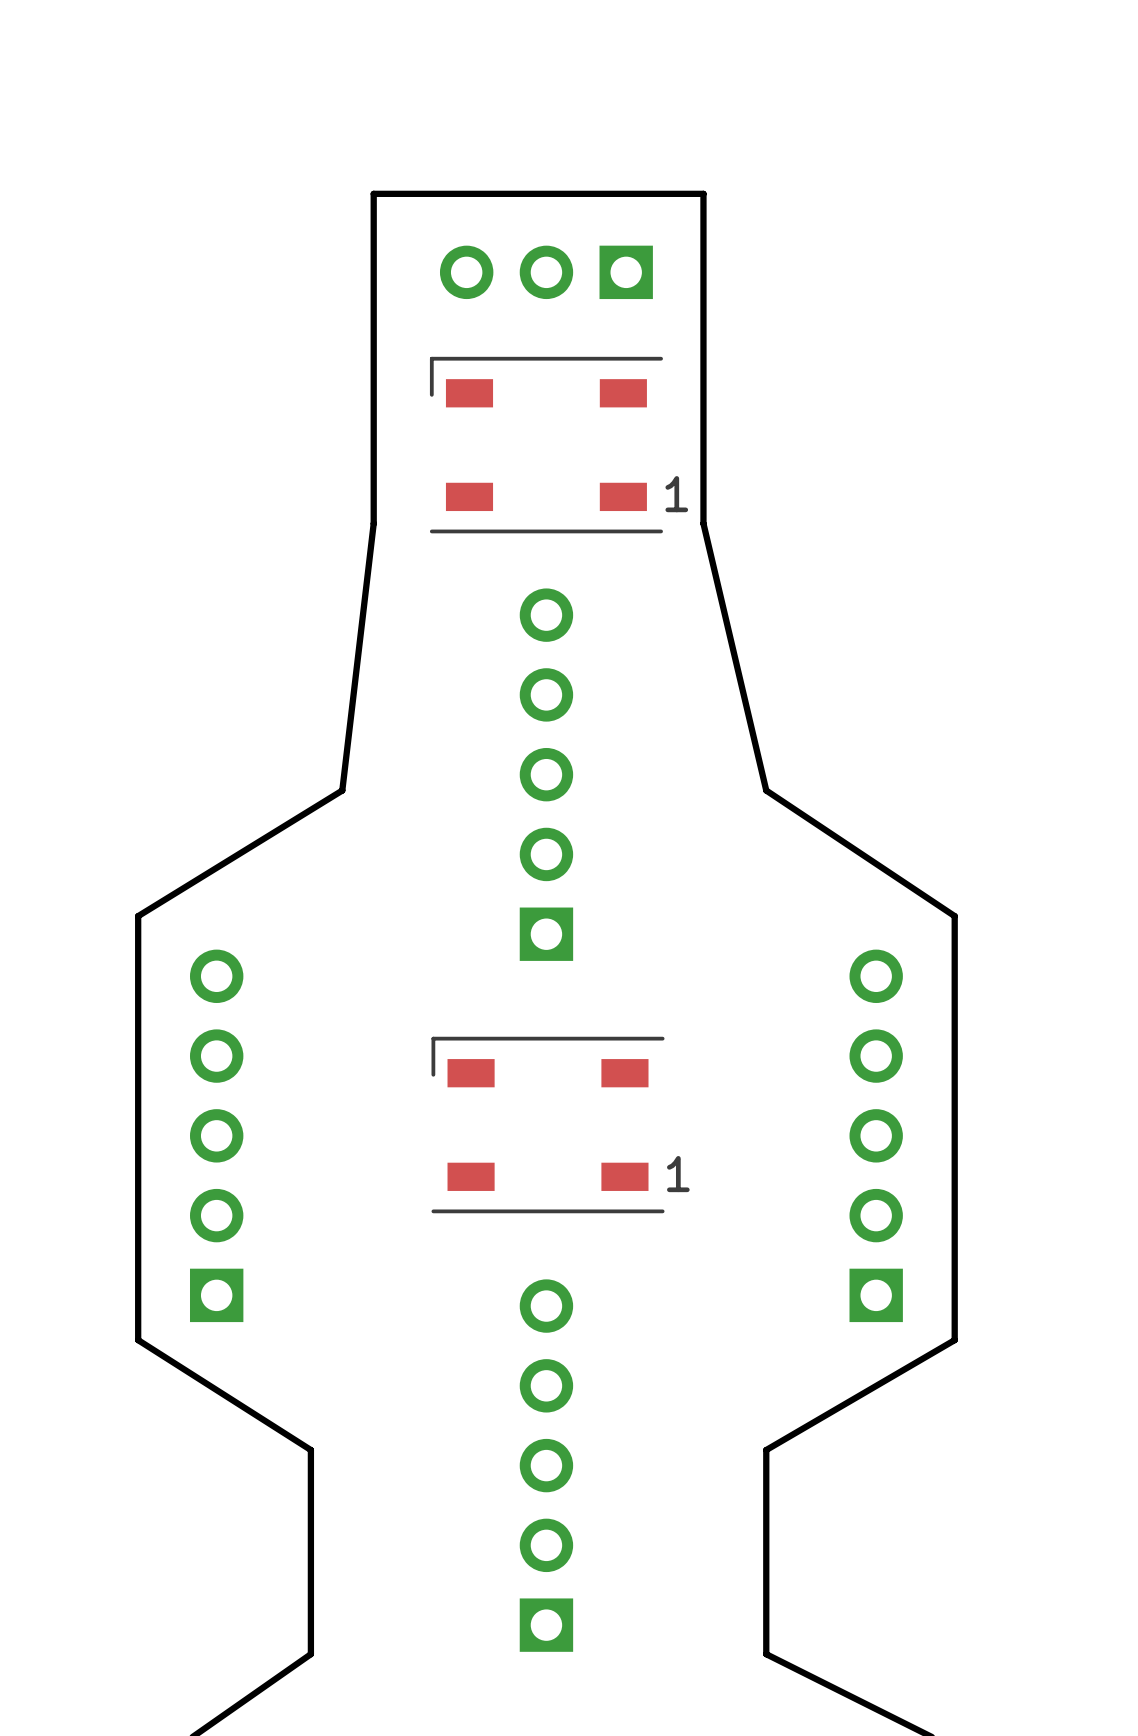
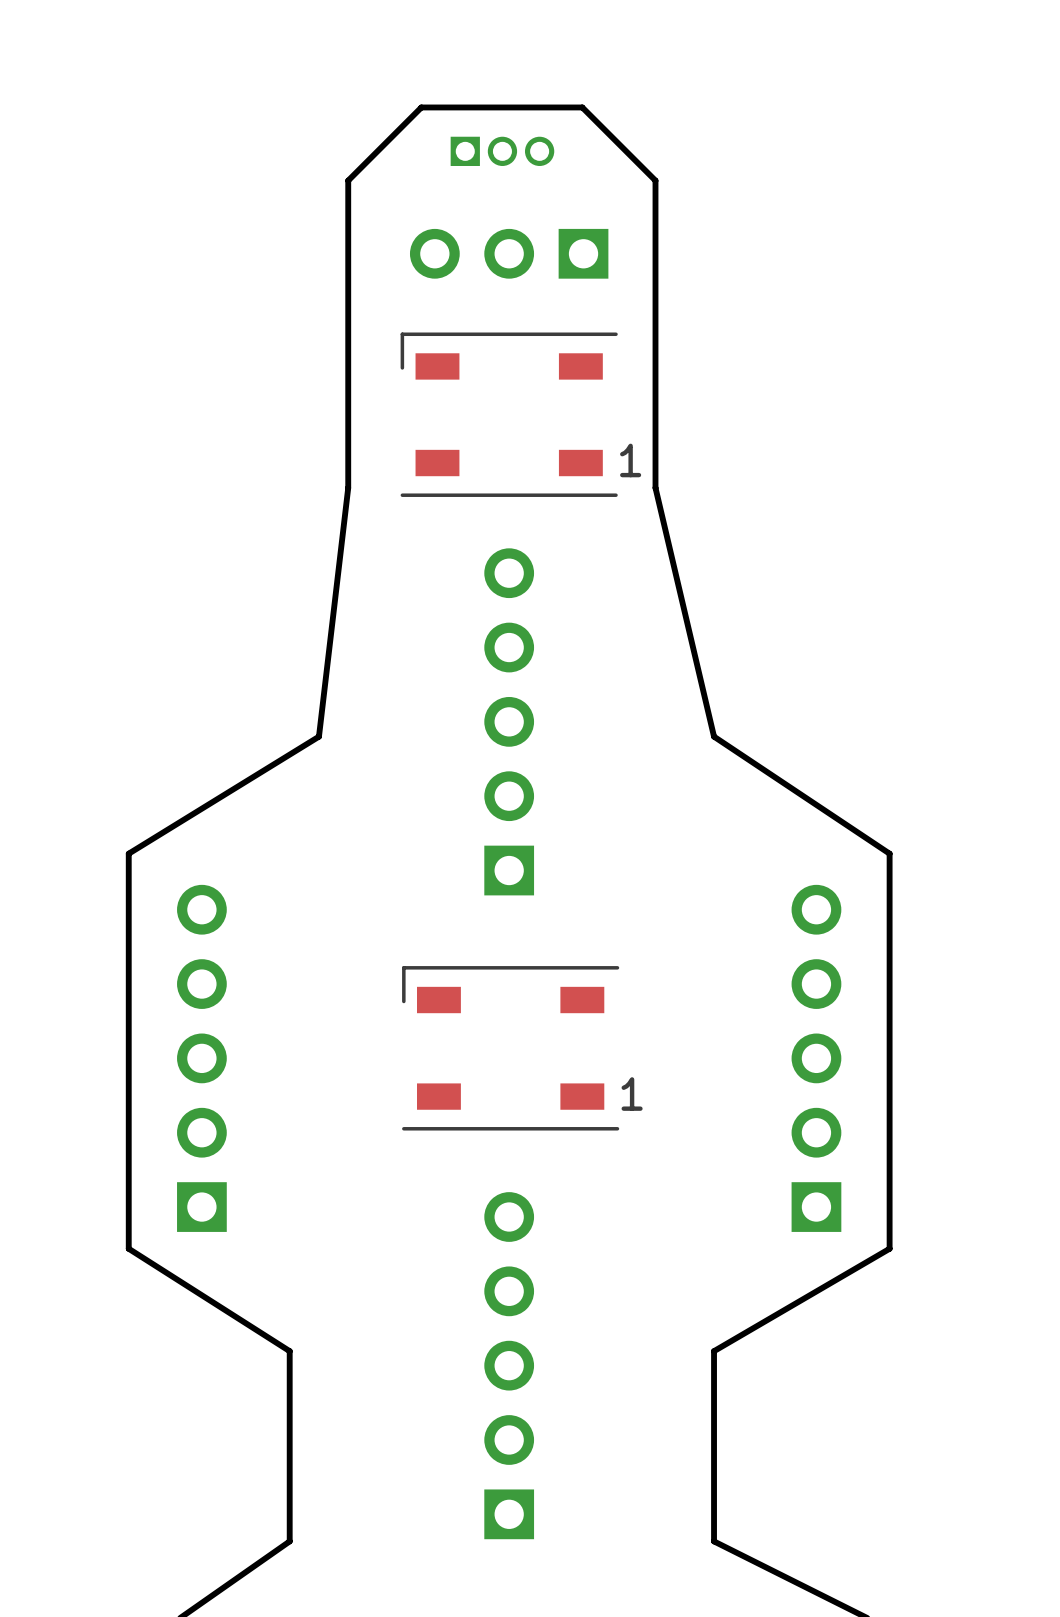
part: none -> (502, 151)
board edge: (373, 193) (703, 193) -> (348, 180) (421, 107) (582, 107) (655, 180)

